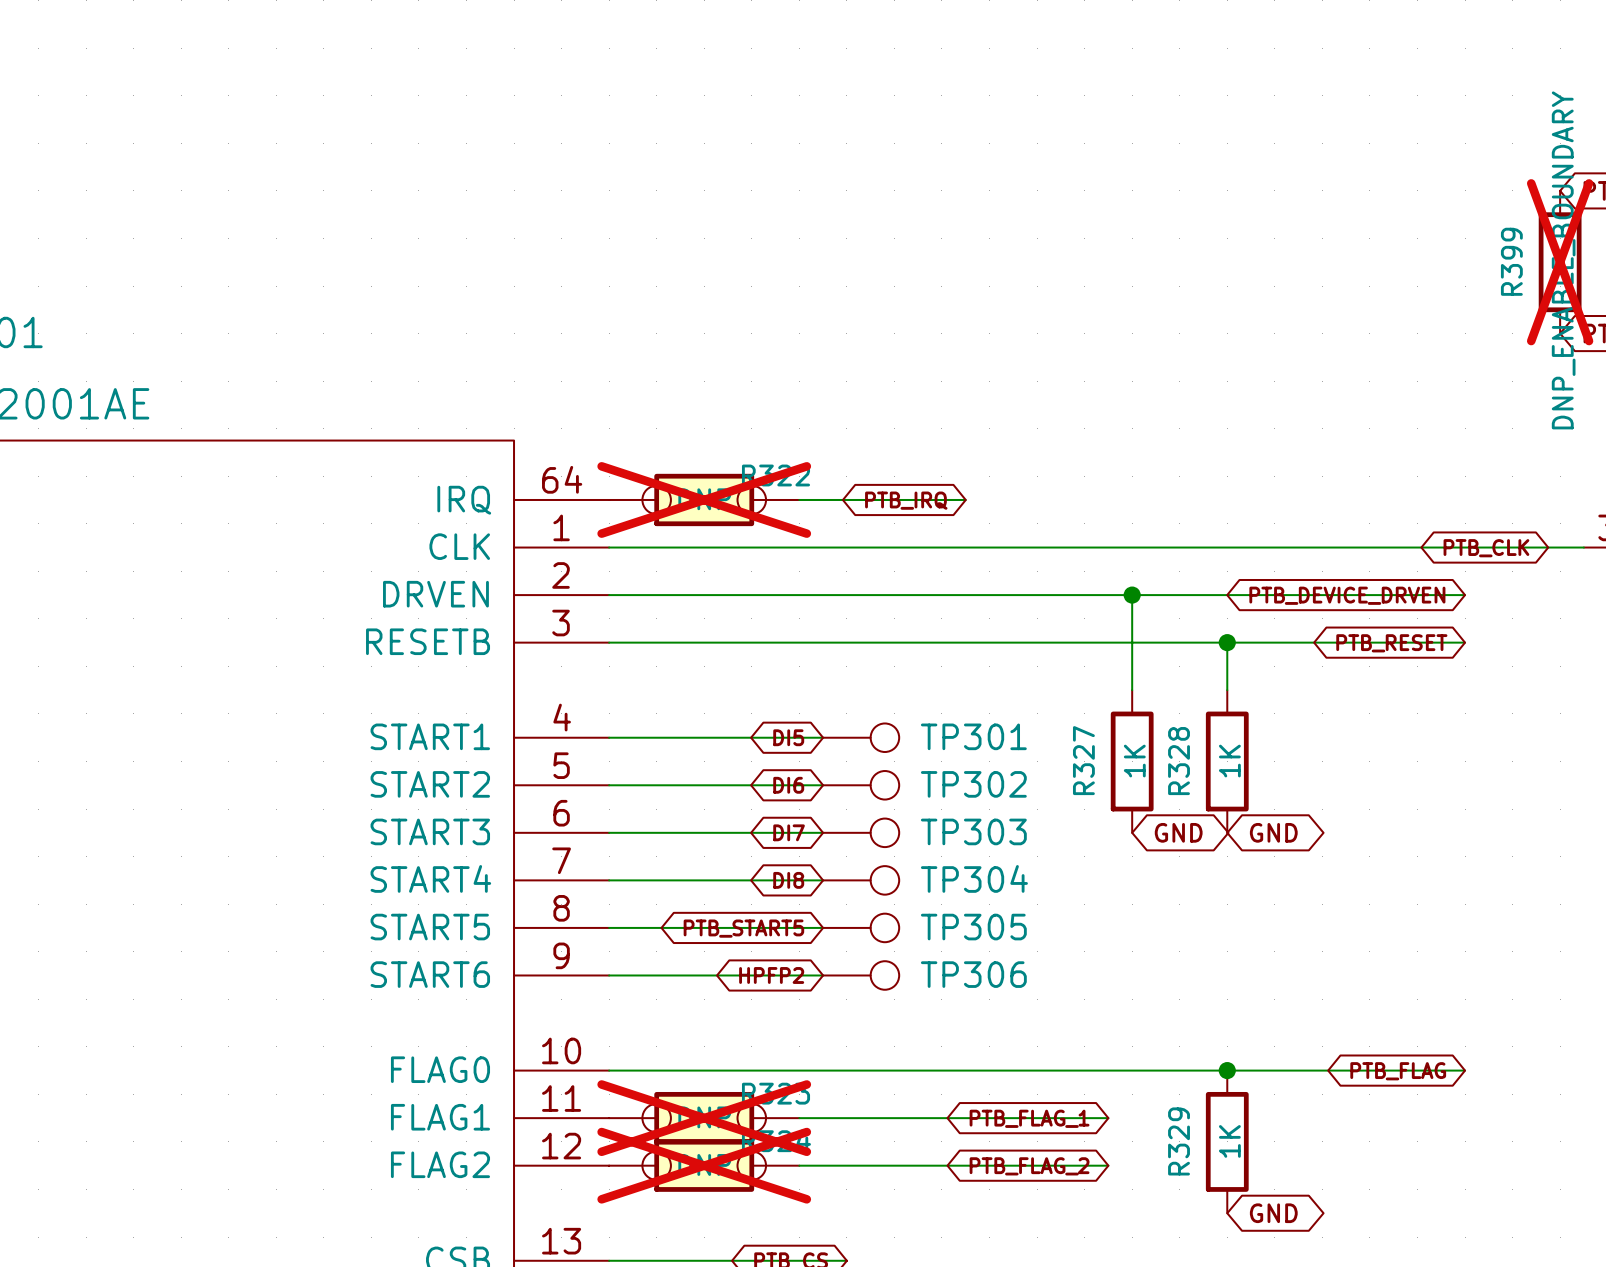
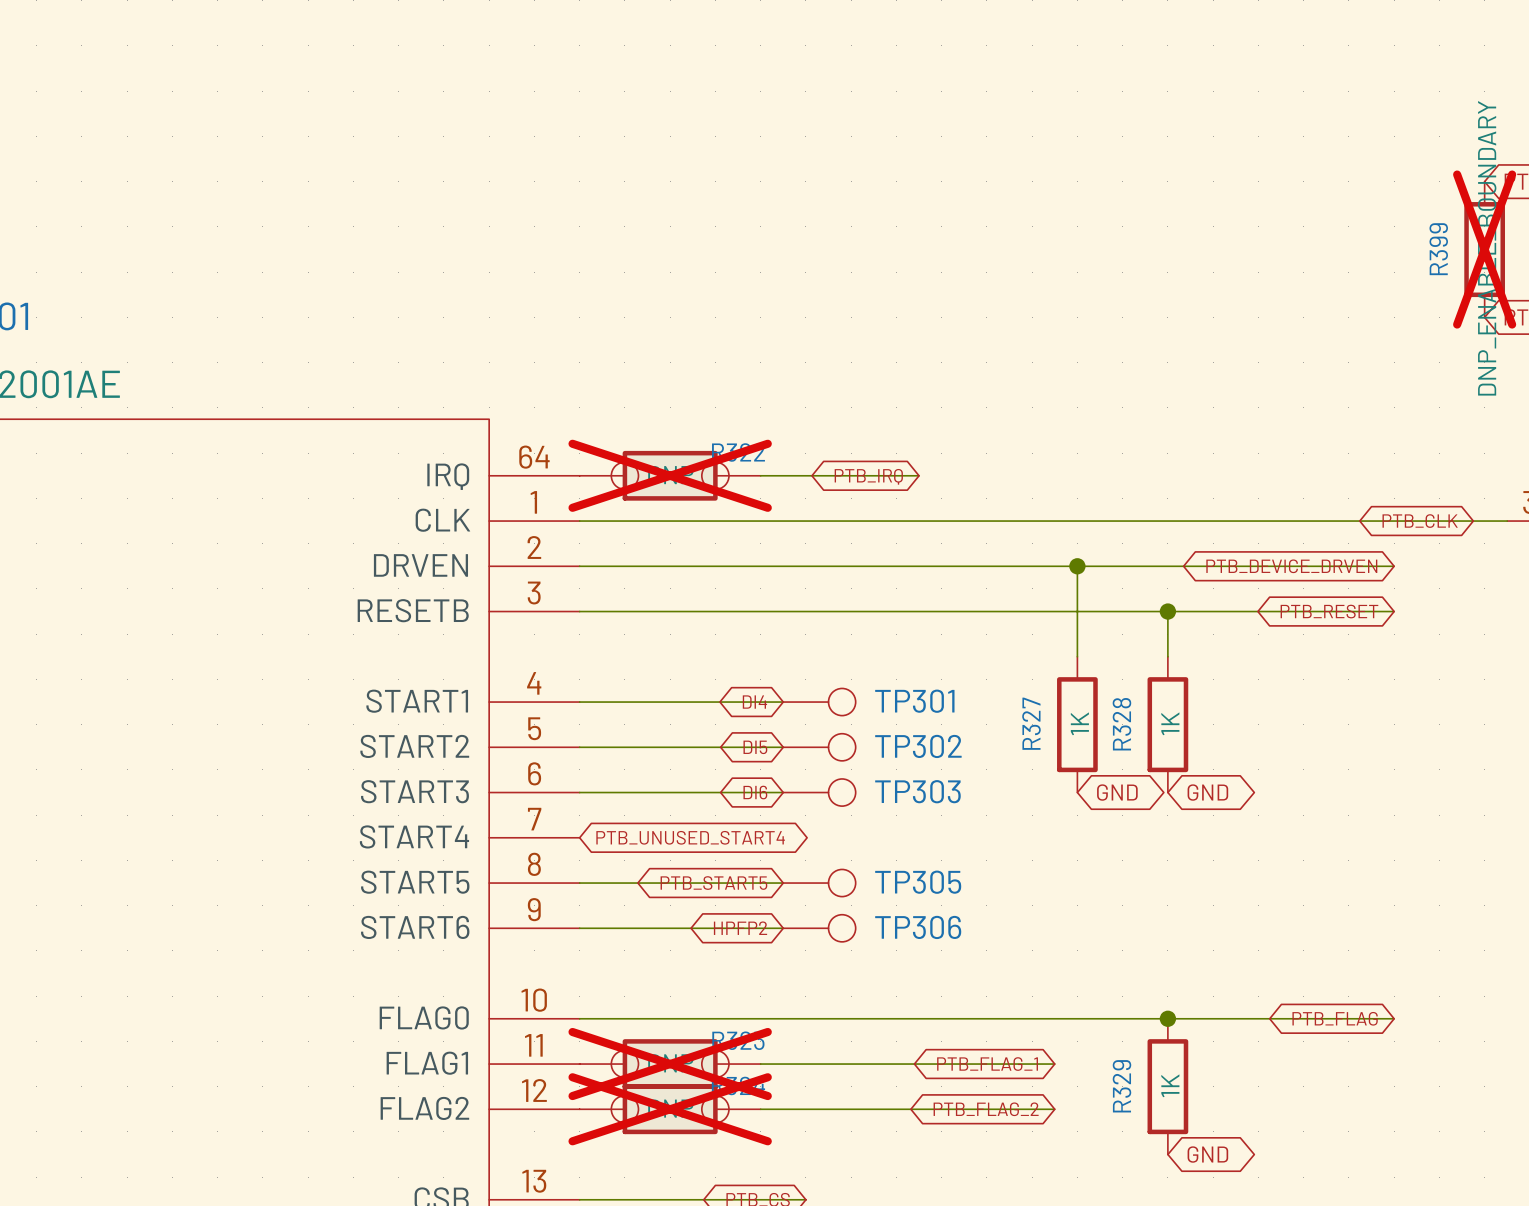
global label: DI5 (788, 737) -> DI4 (754, 702)
global label: DI6 (788, 785) -> DI5 (755, 747)
global label: DI7 (789, 832) -> DI6 (755, 792)
wire: (609, 880) (823, 880) -> none
global label: none -> PTB_UNUSED_START4 (690, 837)
global label: DI8 (788, 880) -> none
TP304: (861, 880) -> none

